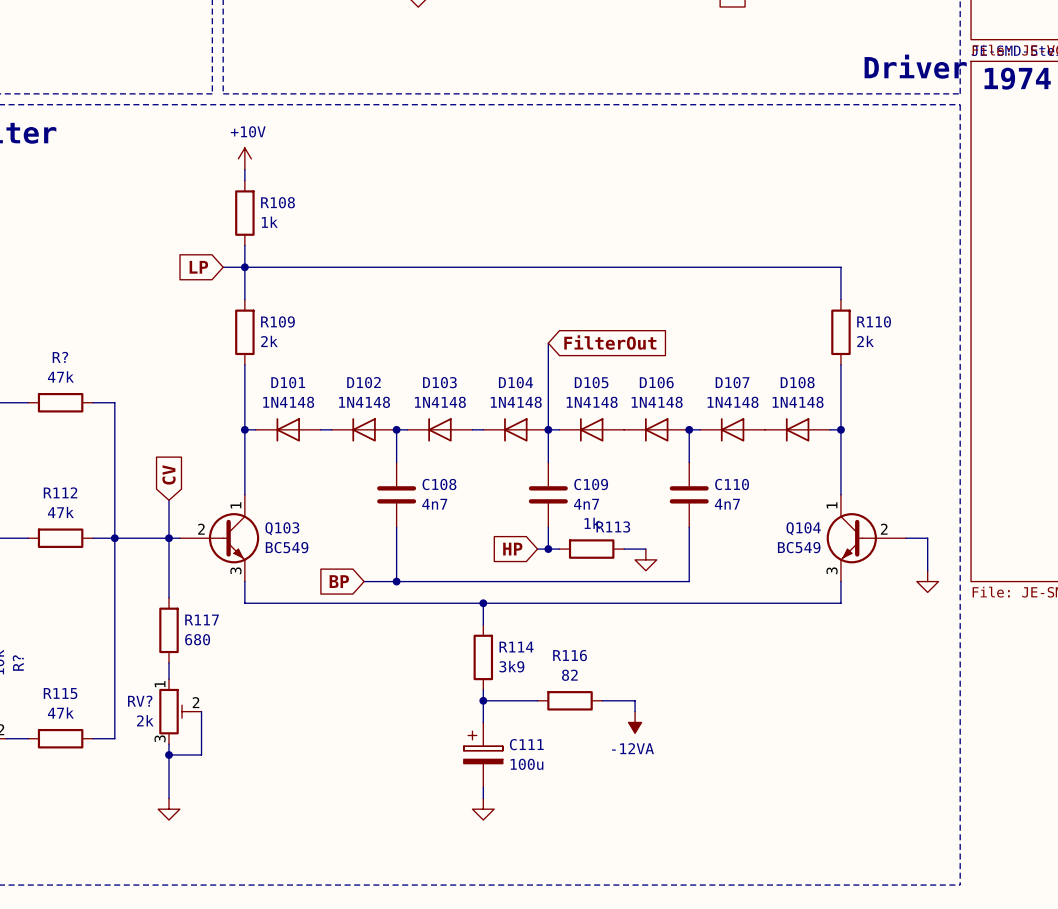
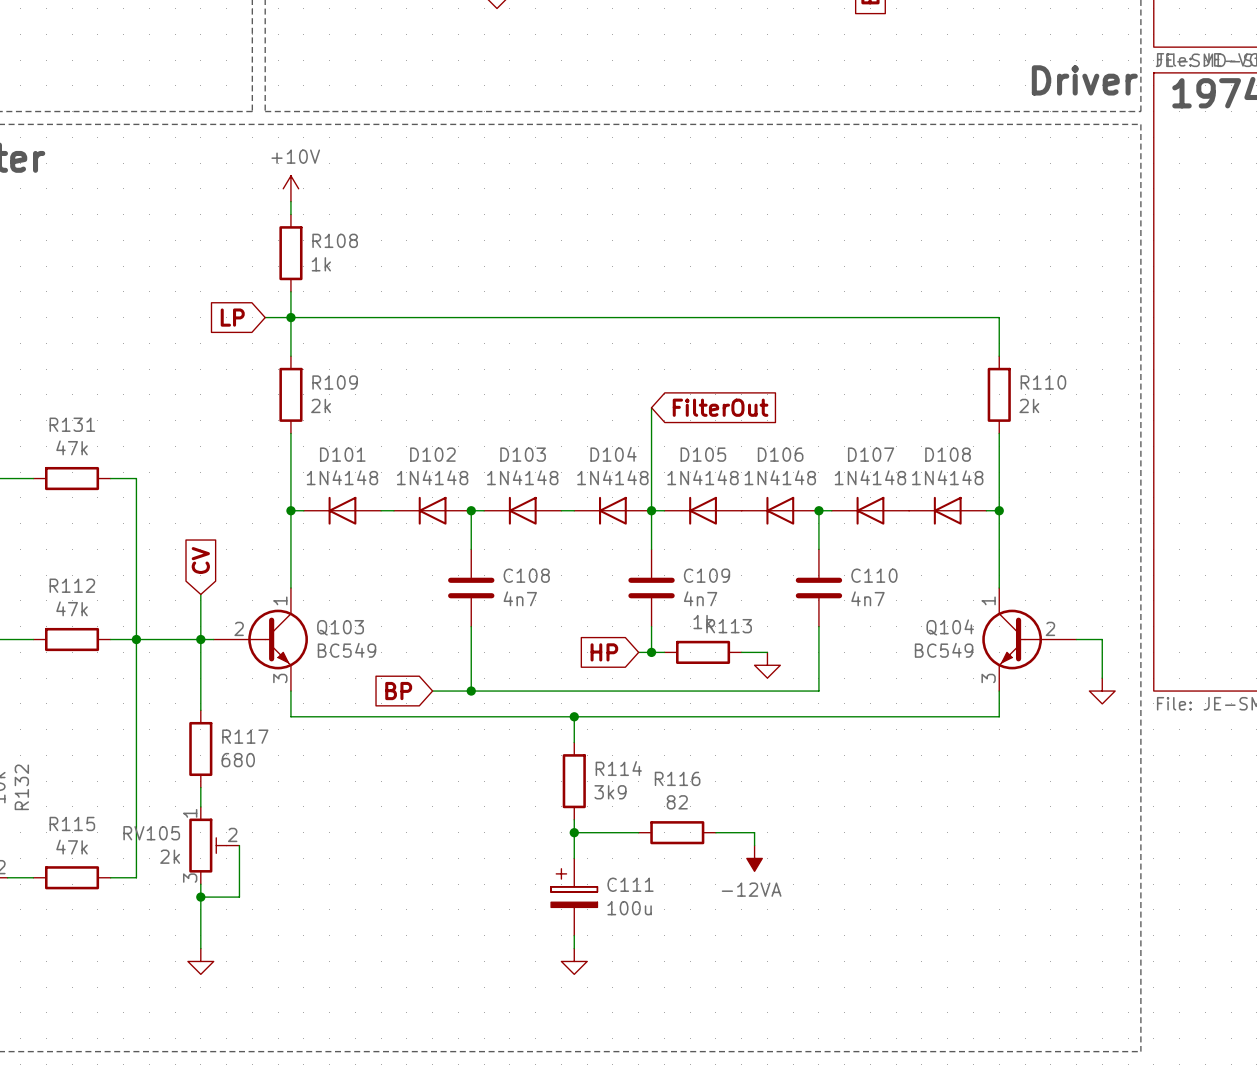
R? name: R? (60, 357) -> R131 (72, 424)
R? name: R? (18, 663) -> R132 (21, 787)
RV? name: RV? (140, 701) -> RV105 (151, 833)

